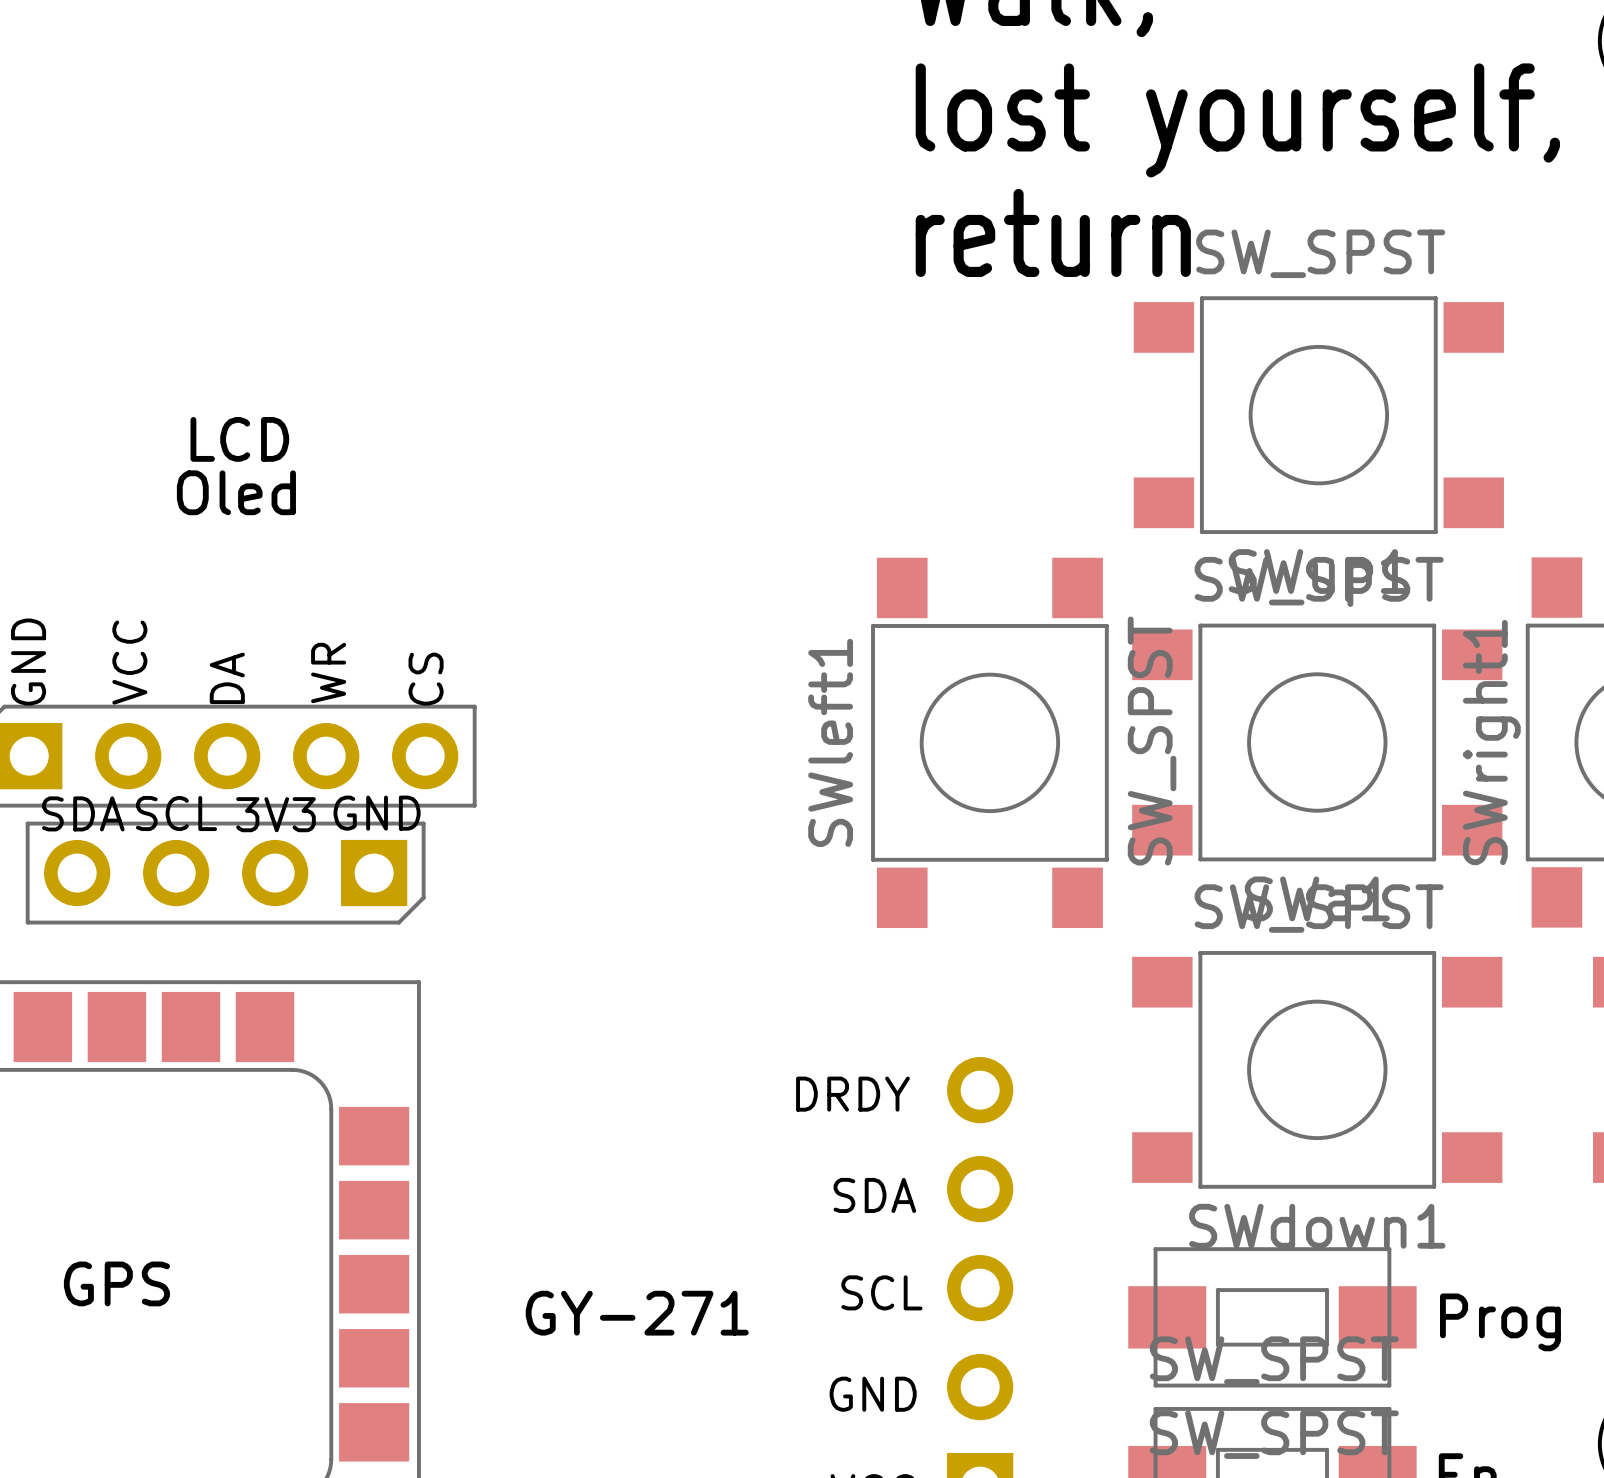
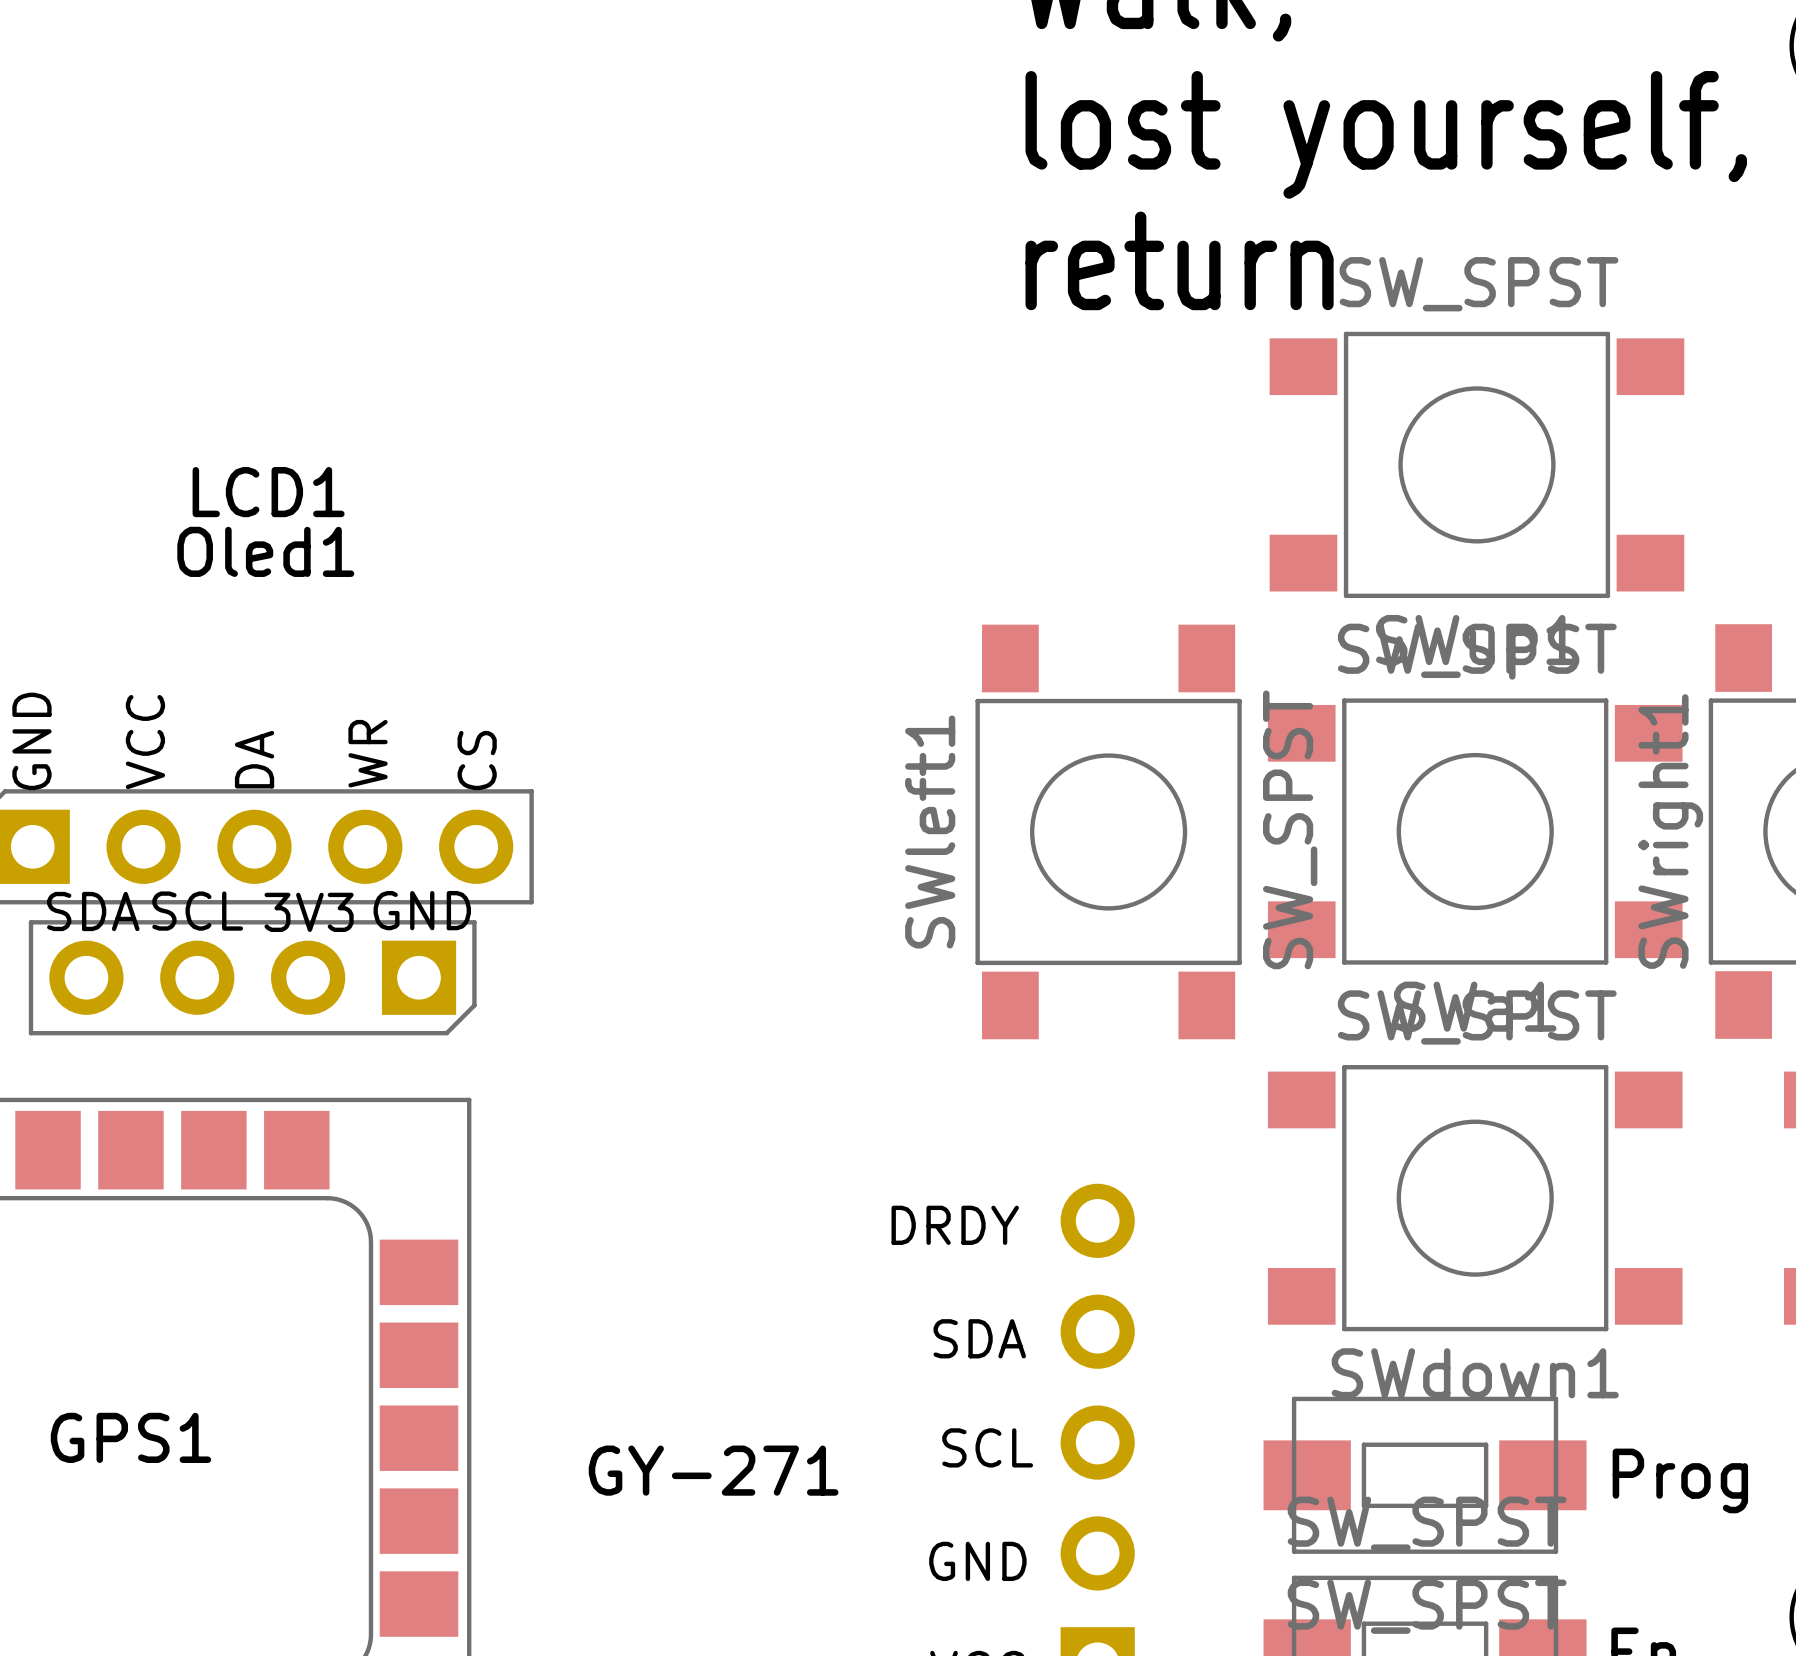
LCD name: LCD (239, 439) -> LCD1 (268, 492)
Oled name: Oled (236, 492) -> Oled1 (265, 551)
GPS name: GPS (116, 1283) -> GPS1 (130, 1437)

